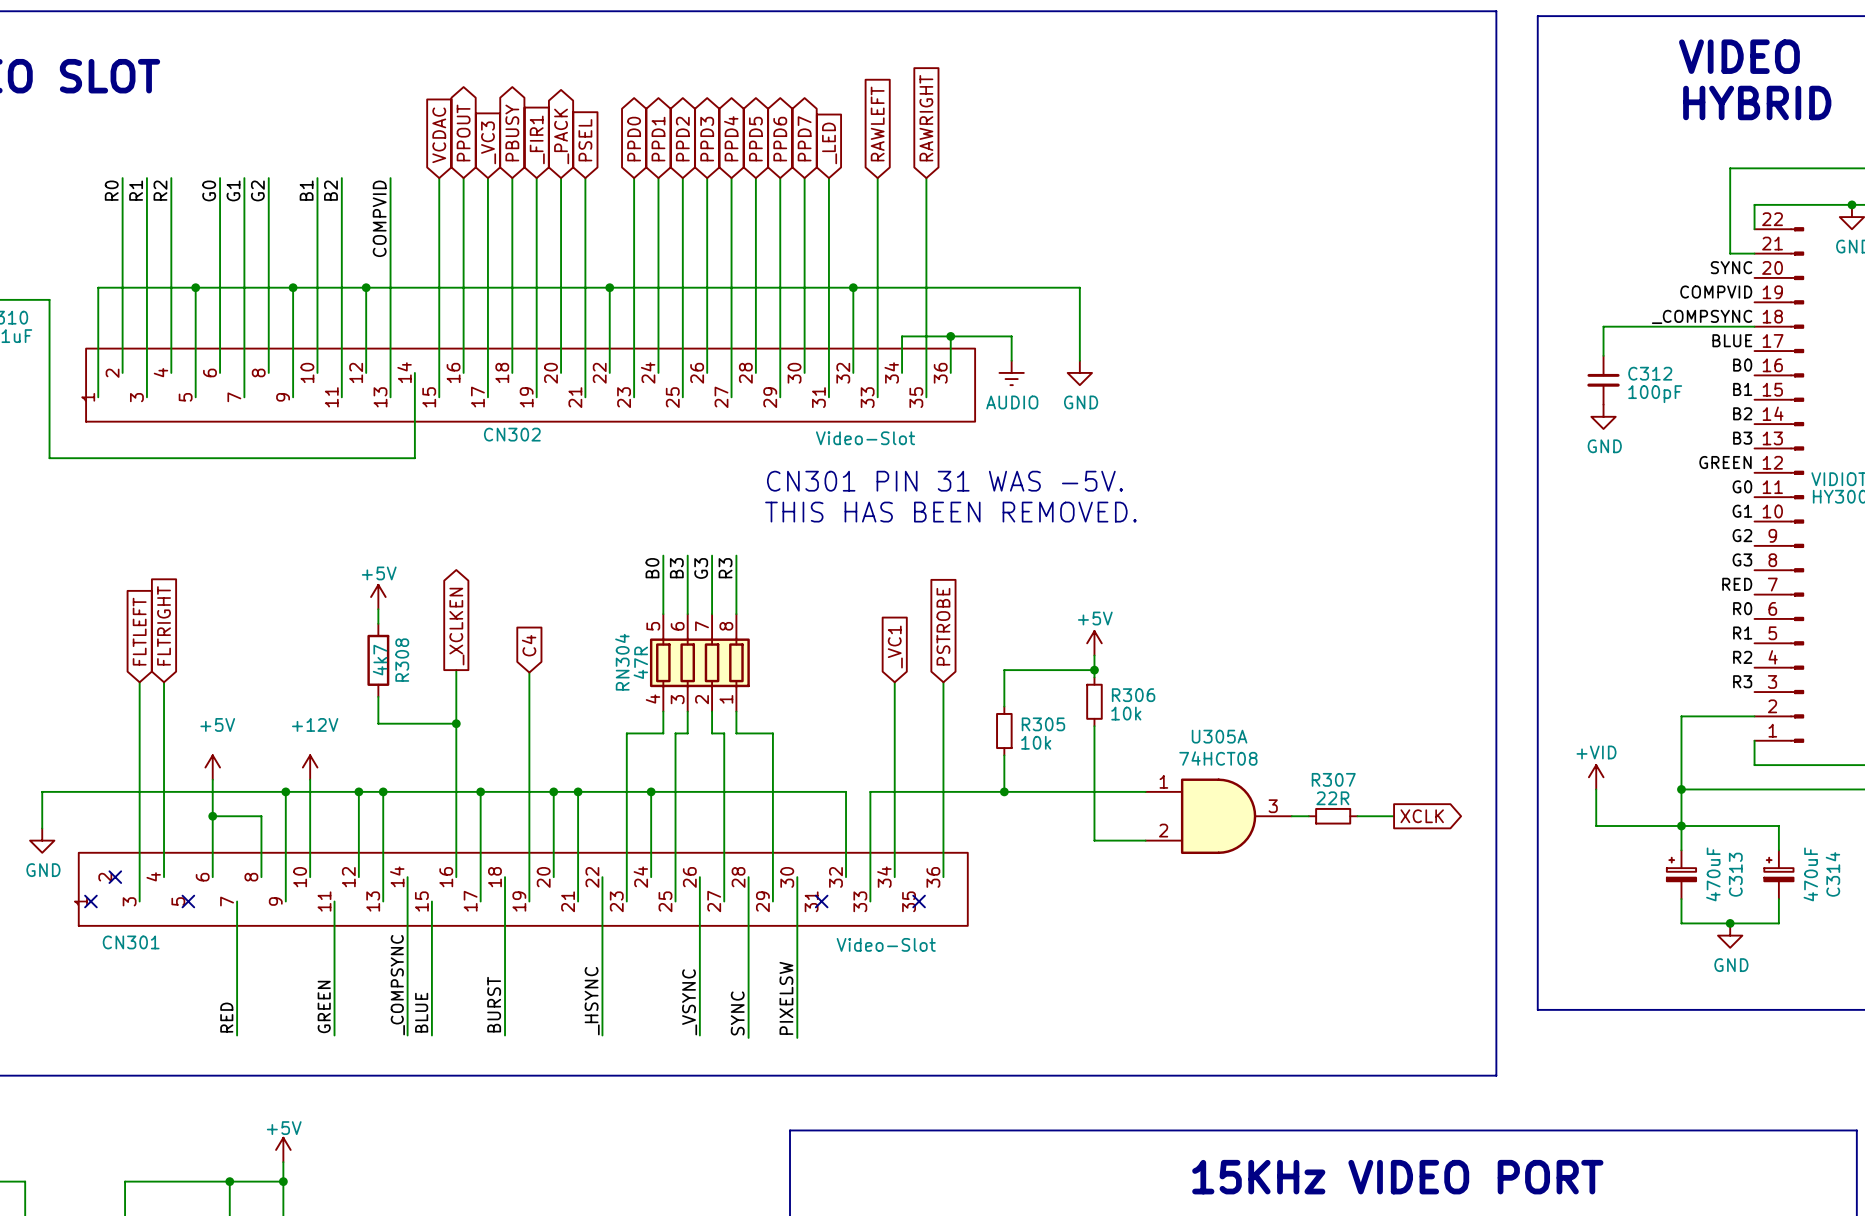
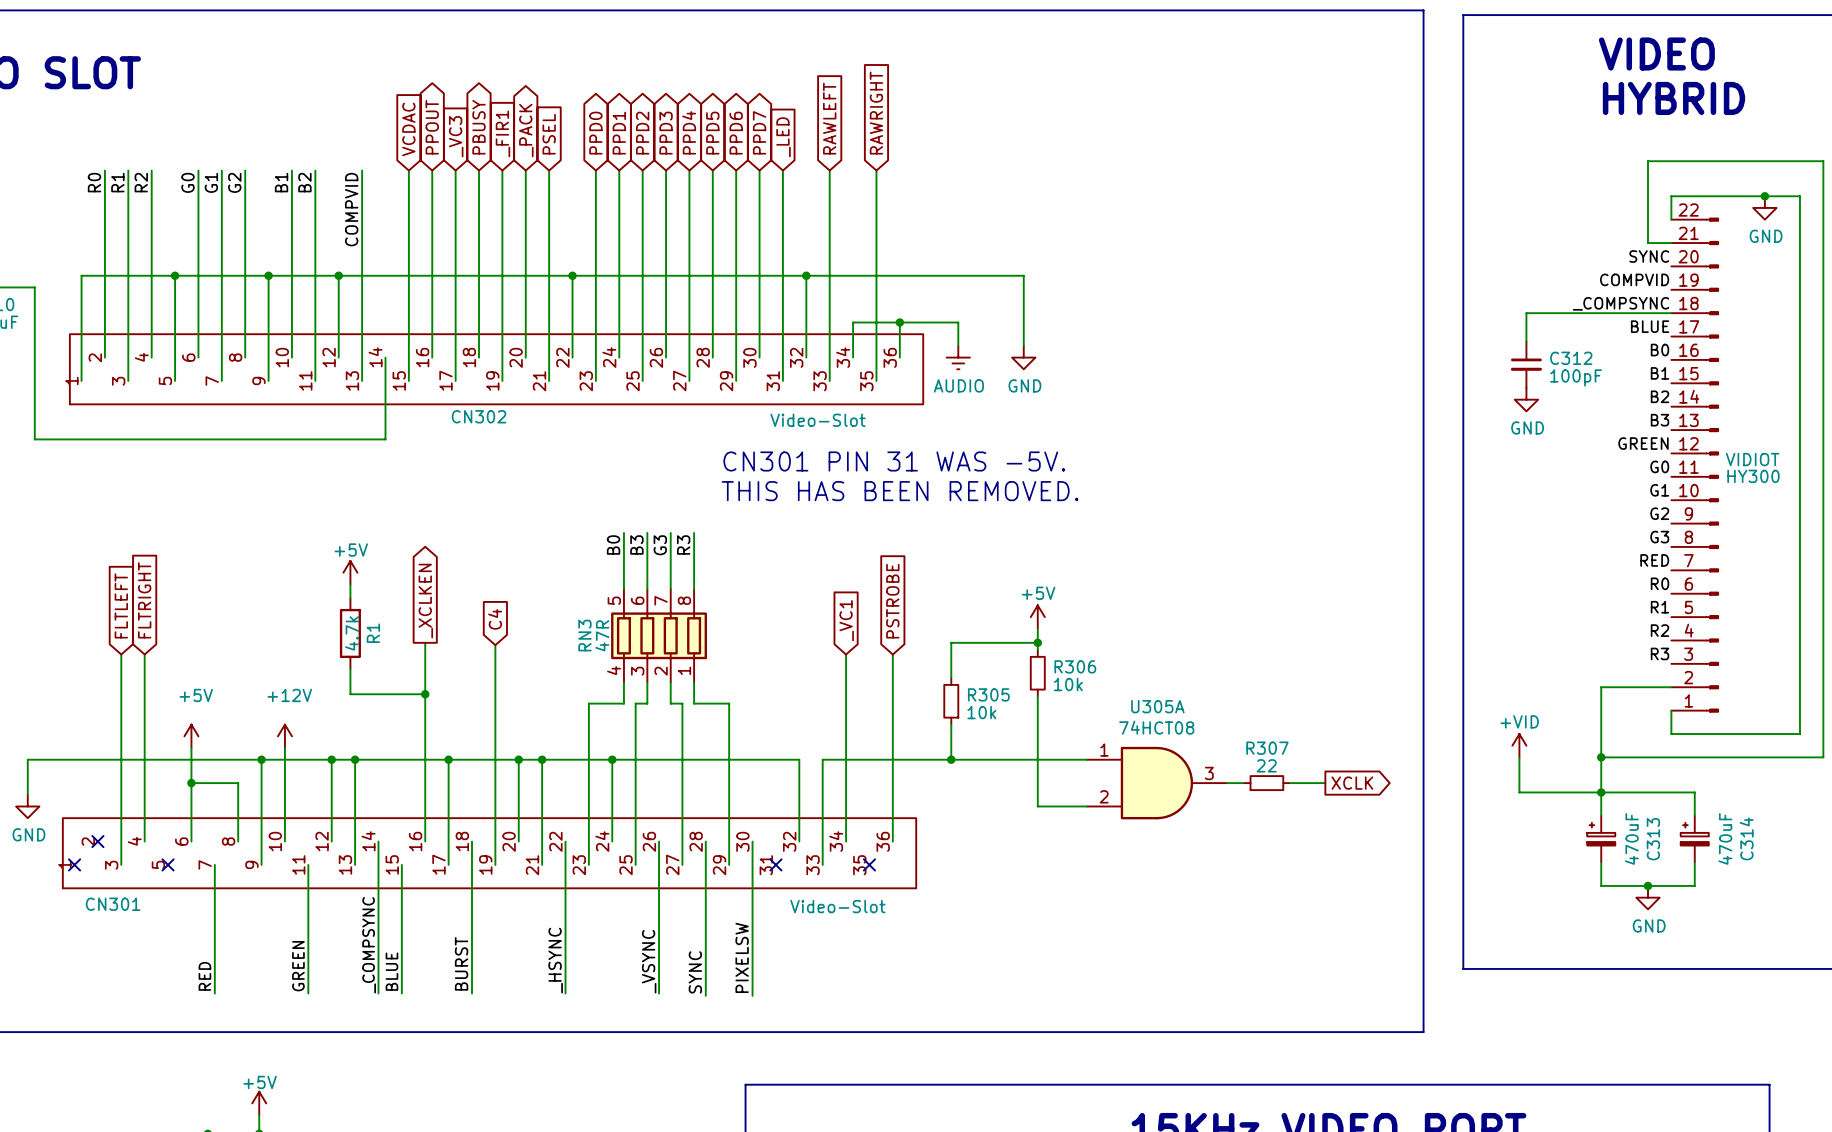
R308 value: 4k7 (380, 660) -> 4.7k (352, 633)
R308 name: R308 (402, 660) -> R1 (373, 633)
RN304 name: RN304 (622, 662) -> RN3 (584, 635)
R307 value: 22R (1332, 798) -> 22 (1266, 765)

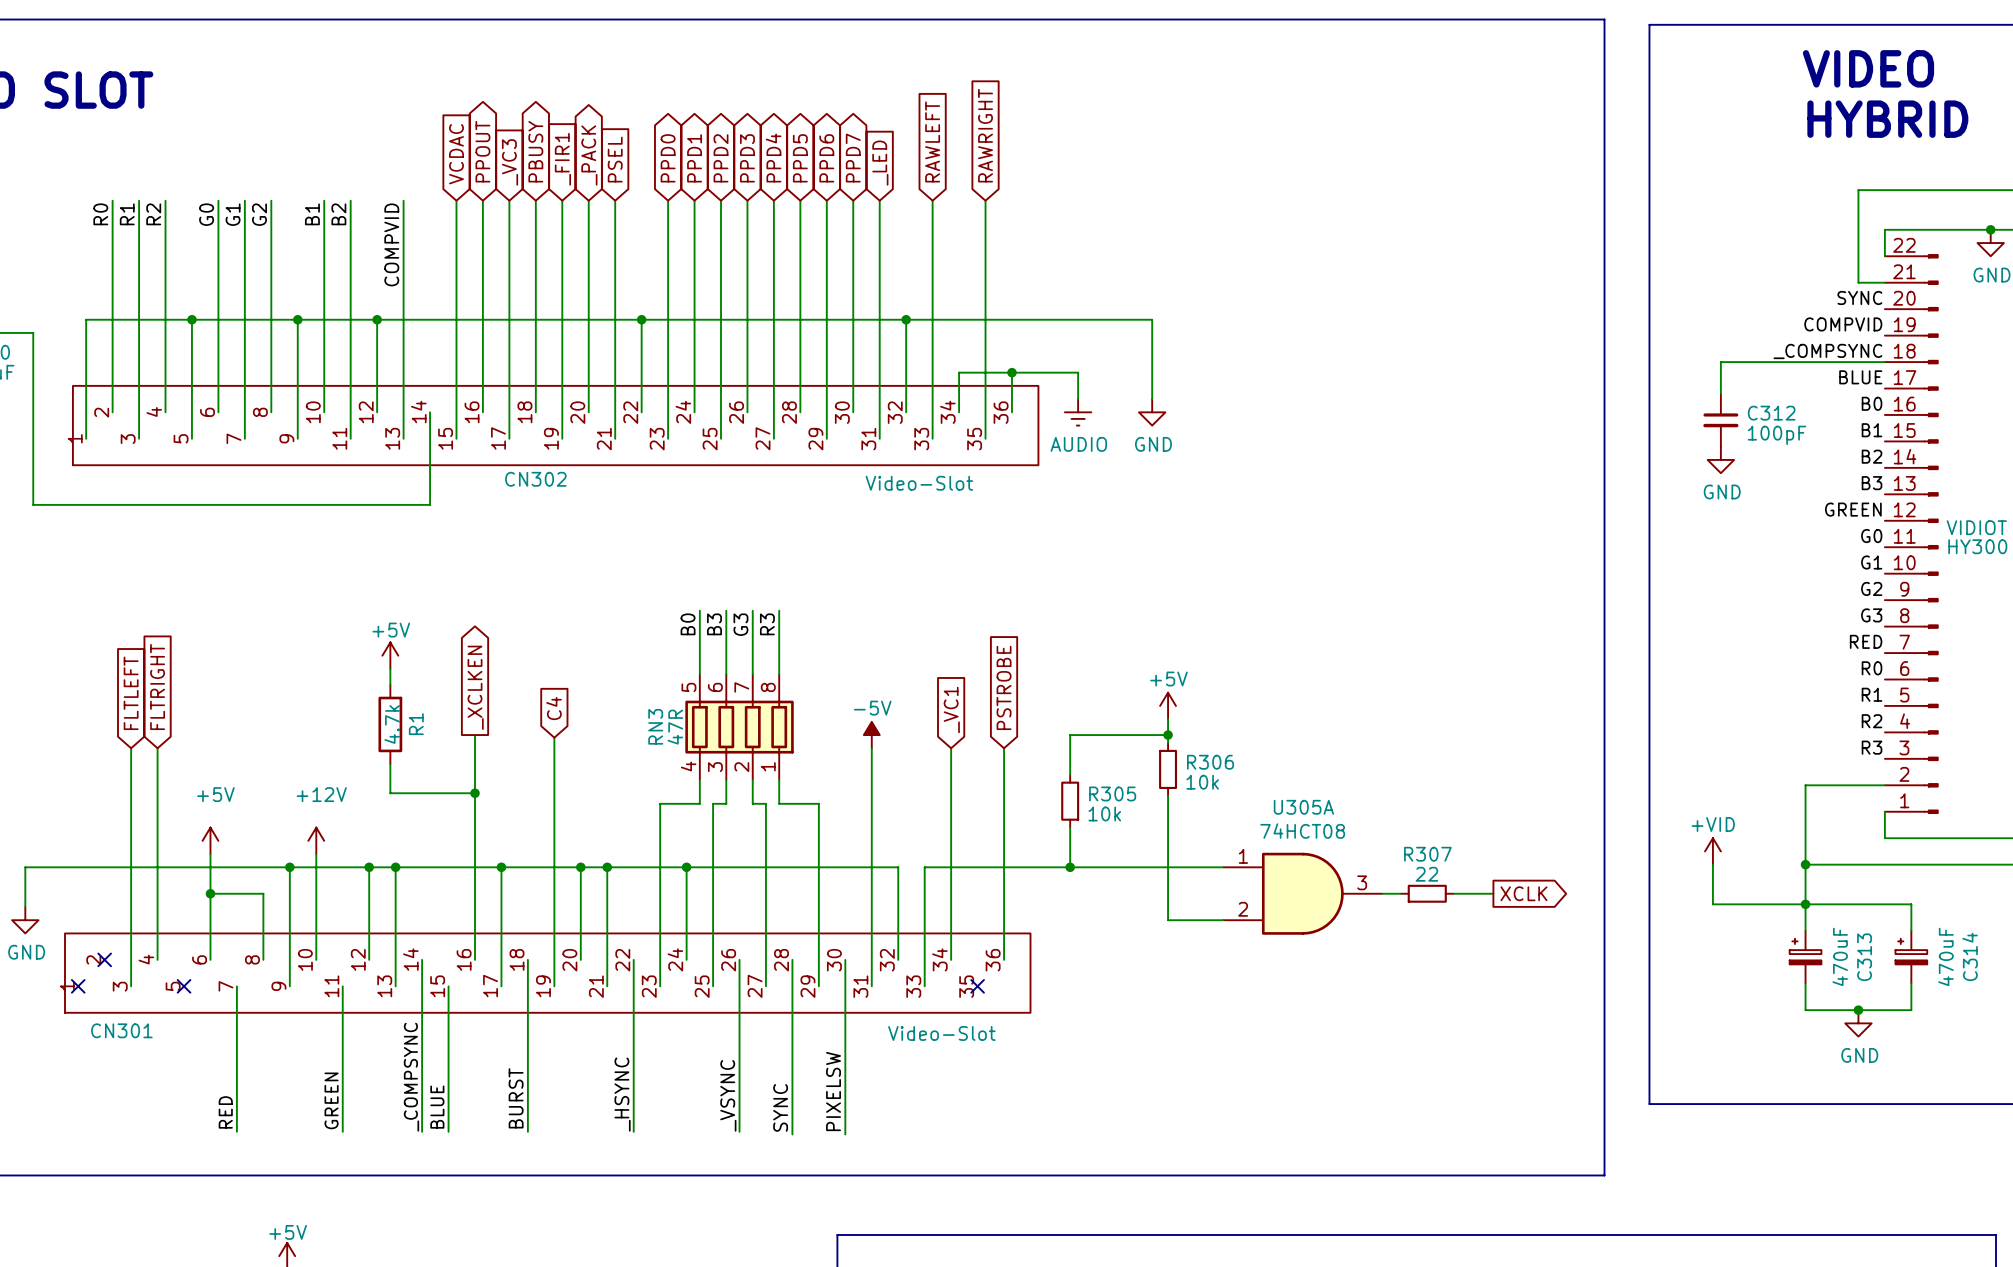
text: CN301 PIN 31 WAS -5V. (894, 461) -> none
text: THIS HAS BEEN REMOVED. (900, 491) -> none
power symbol: none -> -5V (871, 735)
wire: none -> (871, 748) (871, 986)
no-connect mark: (775, 864) -> none

